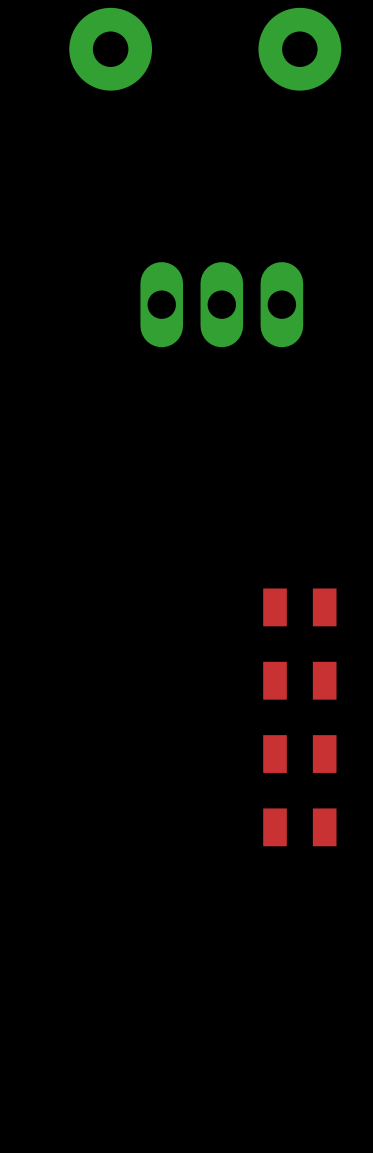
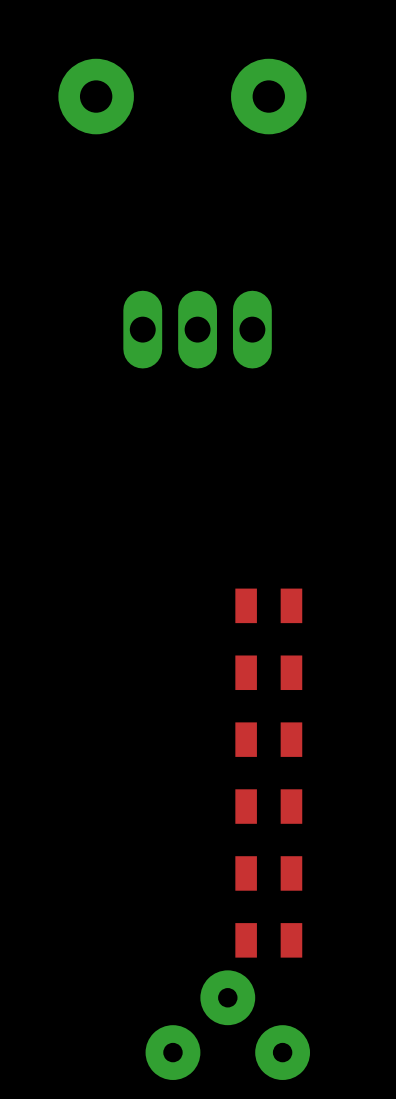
part: none -> (268, 873)
part: none -> (268, 940)
part: none -> (227, 1025)

